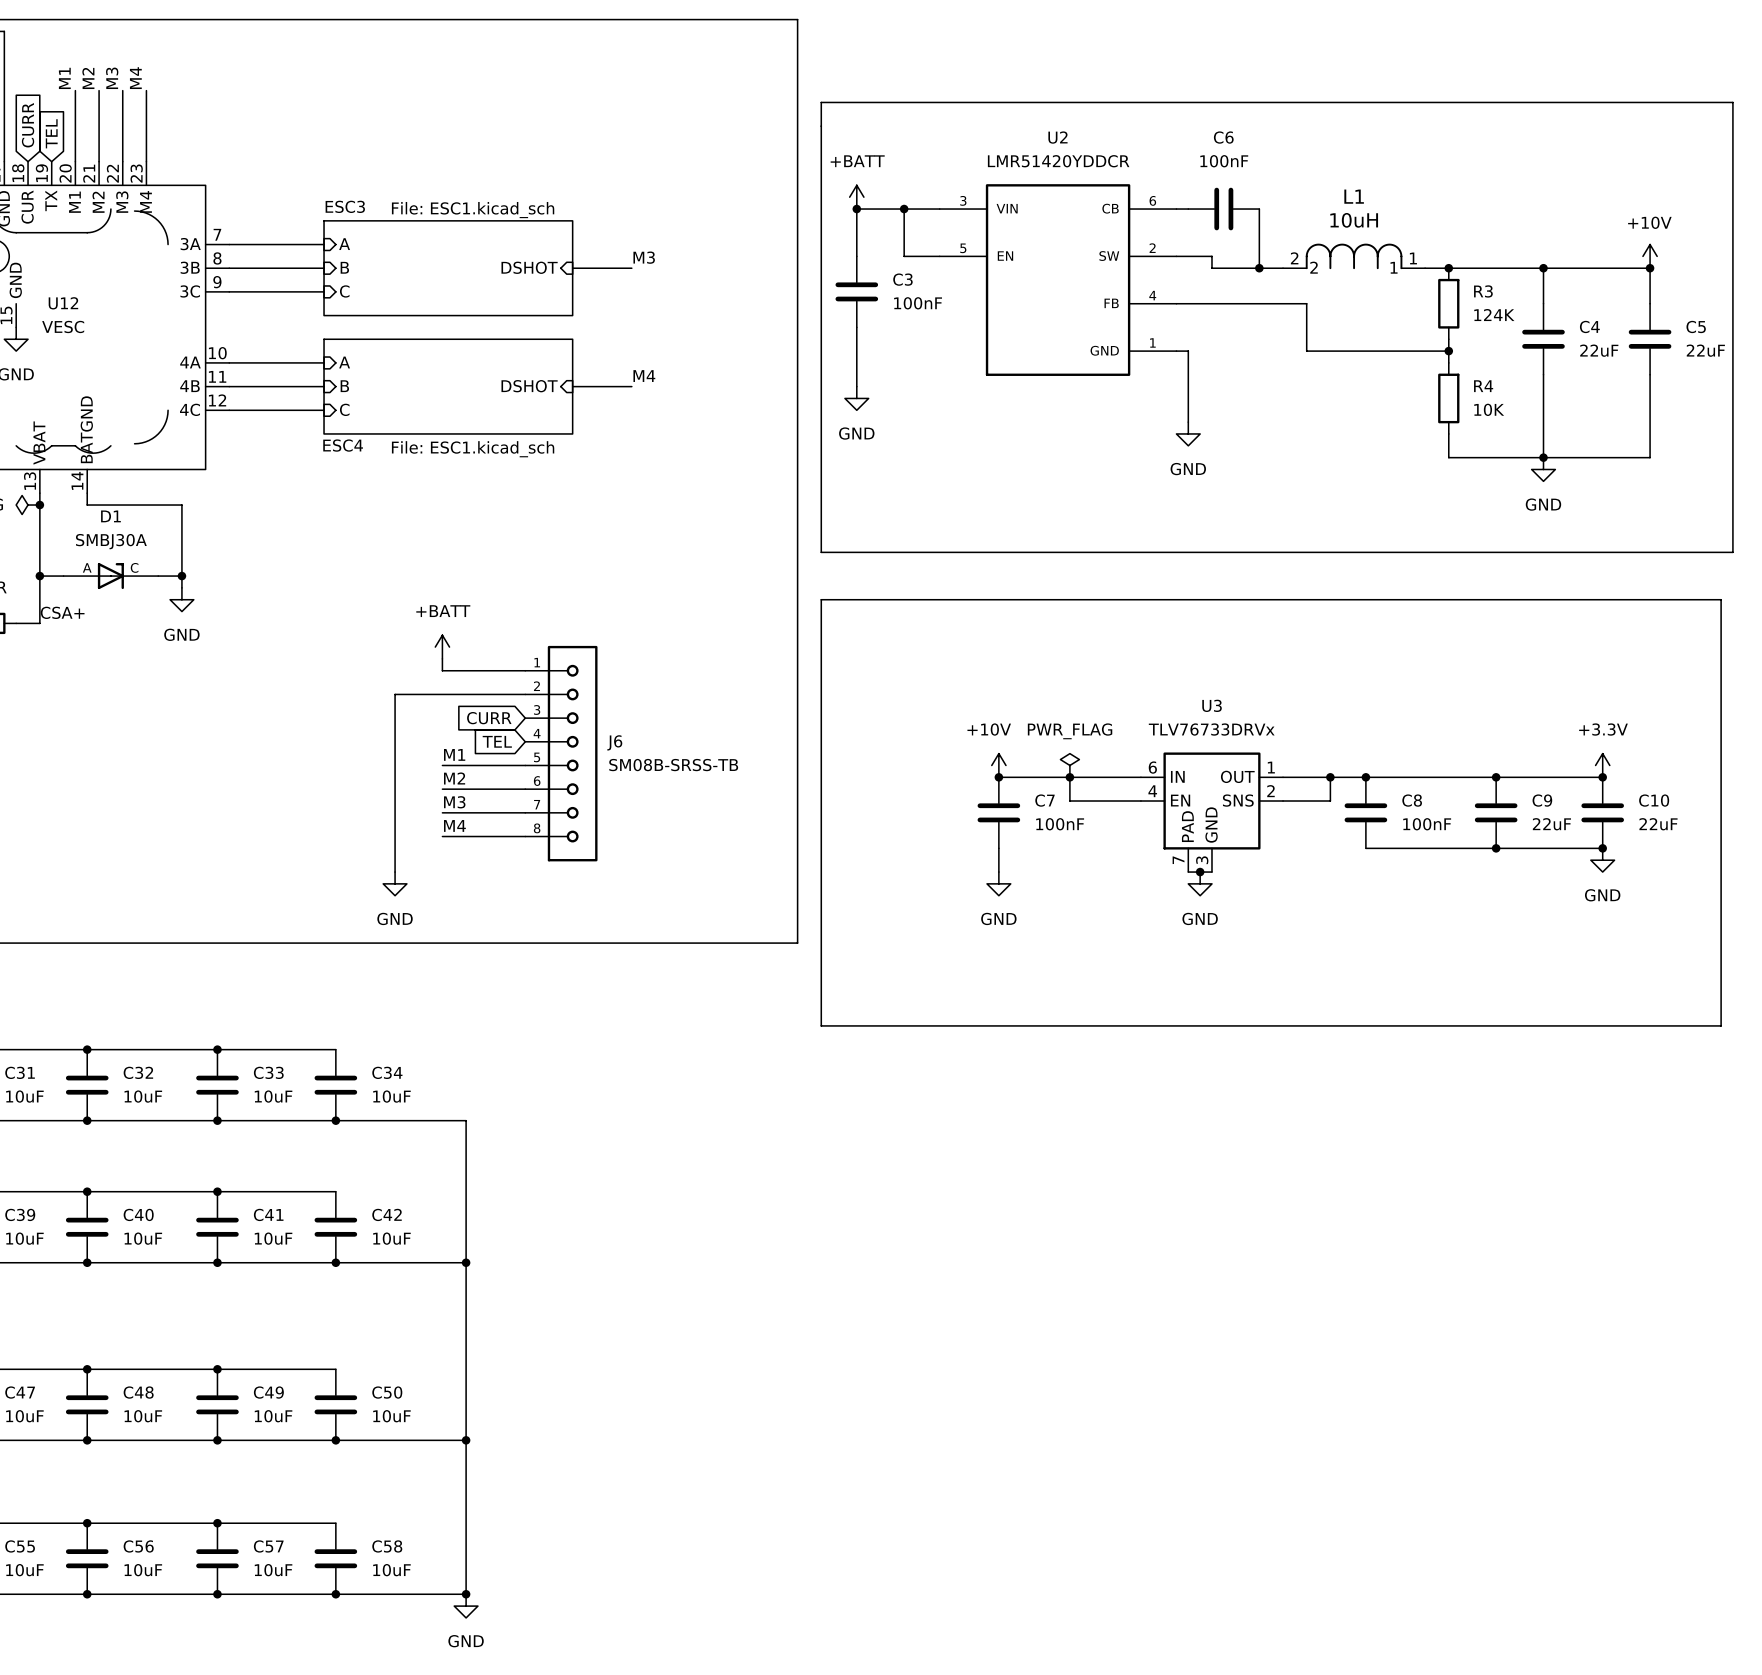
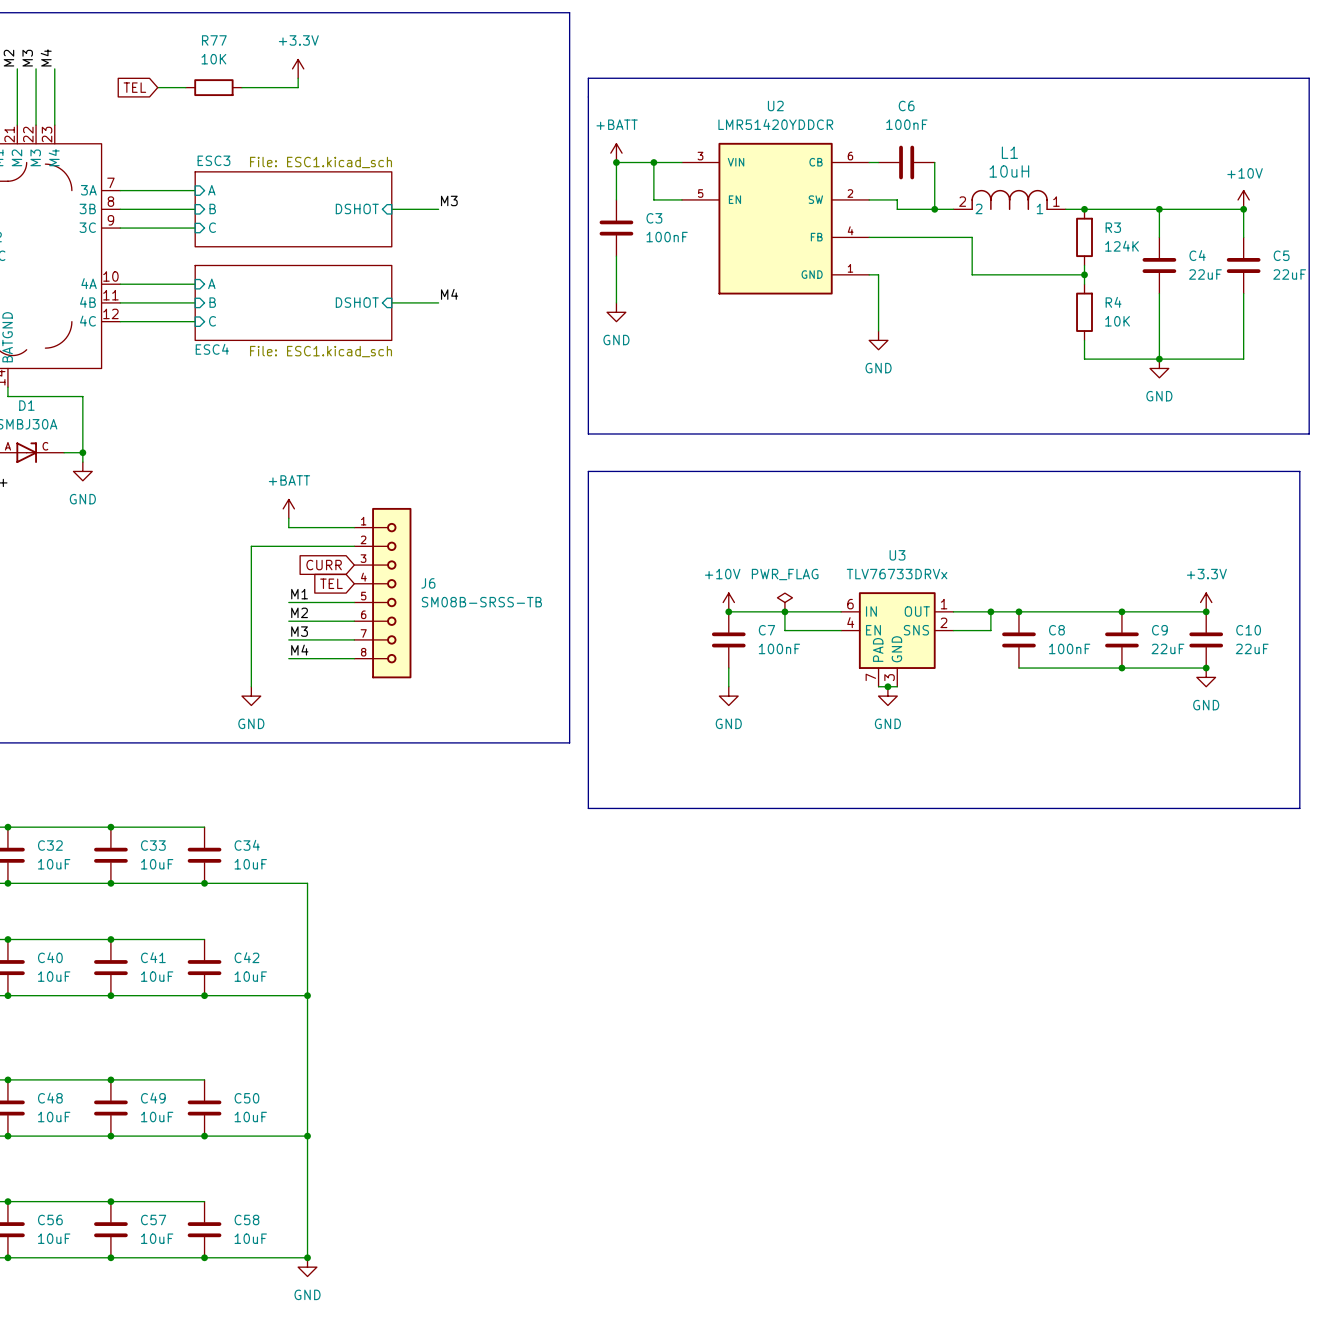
power symbol: none -> +3.3V (298, 68)
wire: none -> (298, 78) (298, 87) (241, 87)
global label: none -> TEL (134, 87)
wire: none -> (157, 87) (185, 87)
R77: none -> 10K (213, 87)

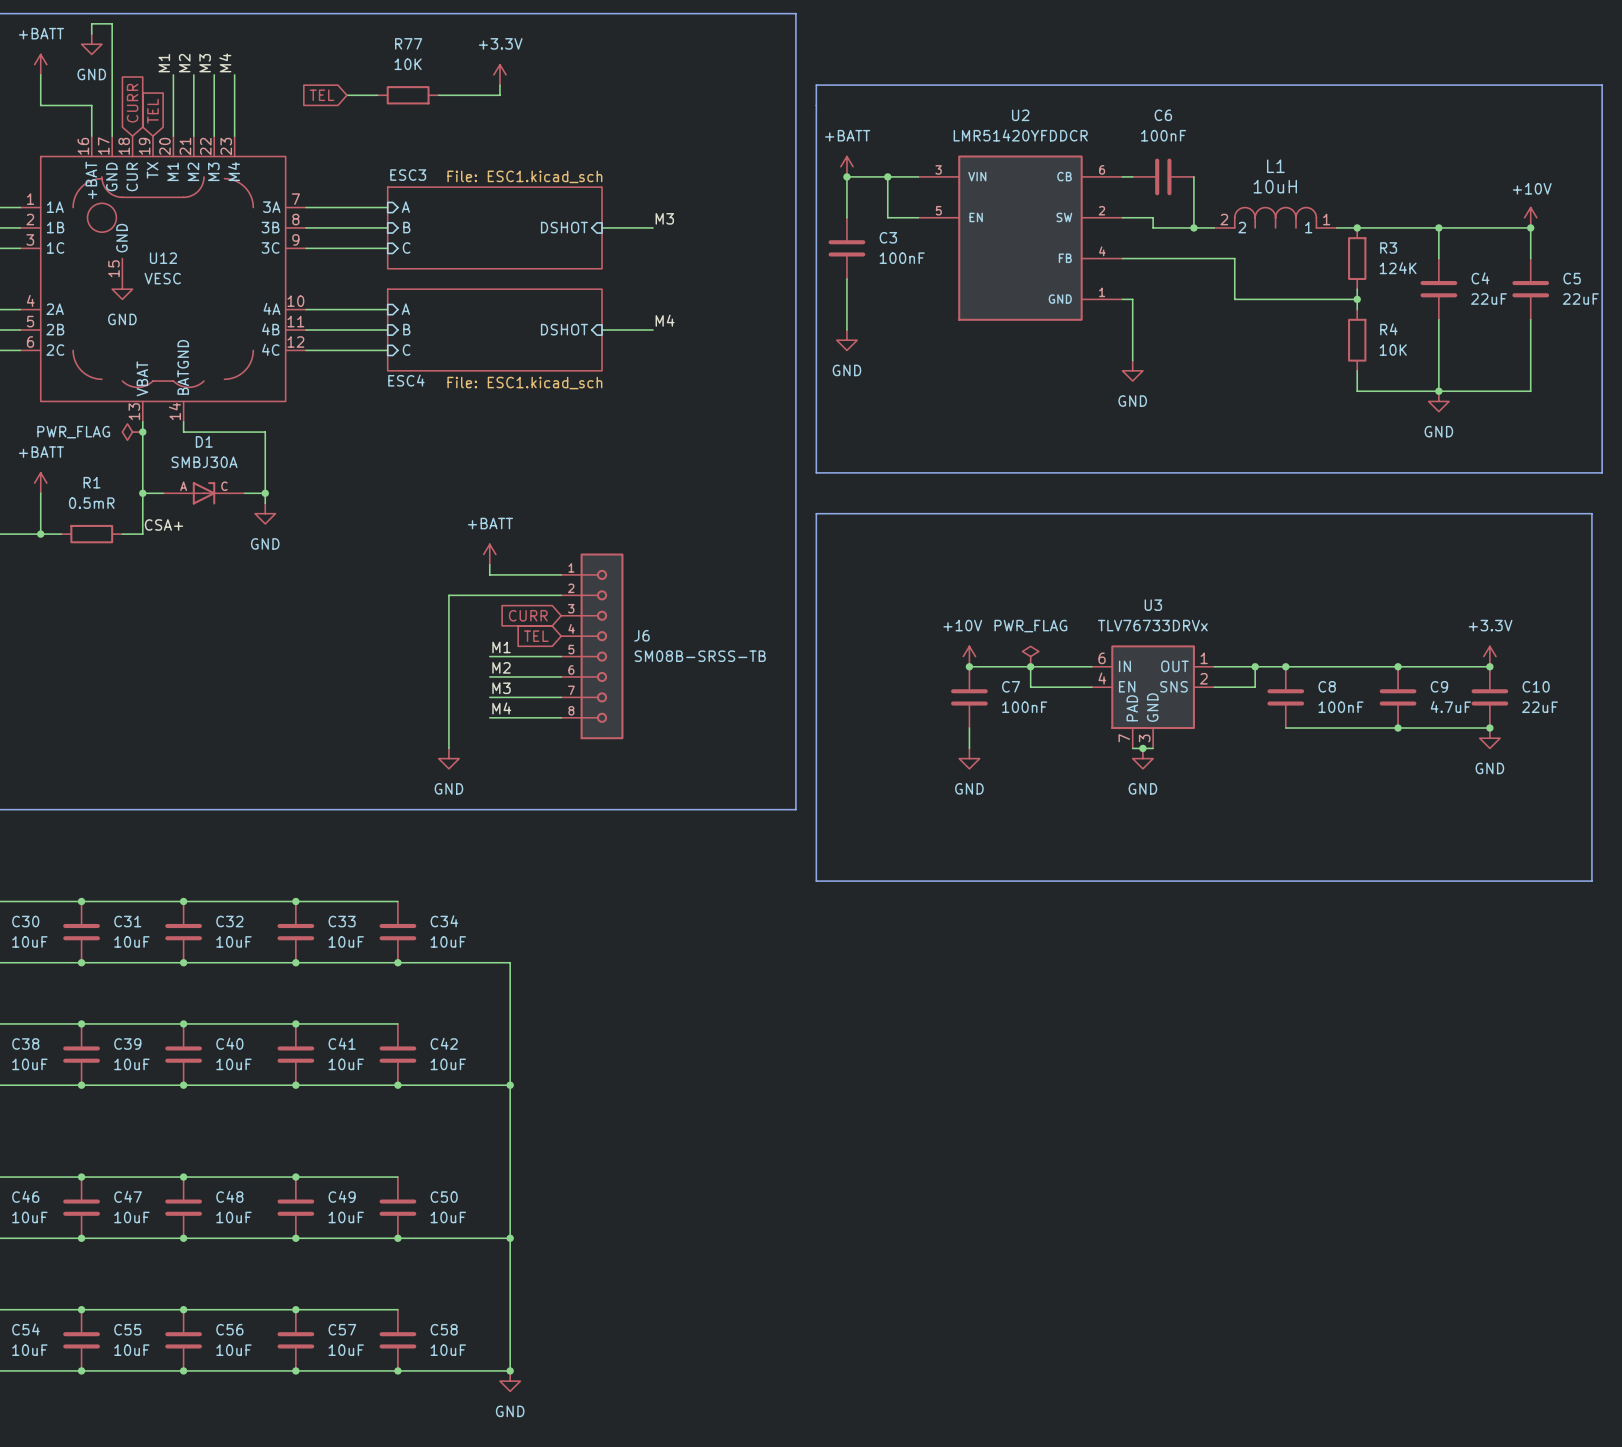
U2 value: LMR51420YDDCR (775, 124) -> LMR51420YFDDCR (1020, 135)
C9 value: 22uF (1167, 648) -> 4.7uF (1450, 706)

